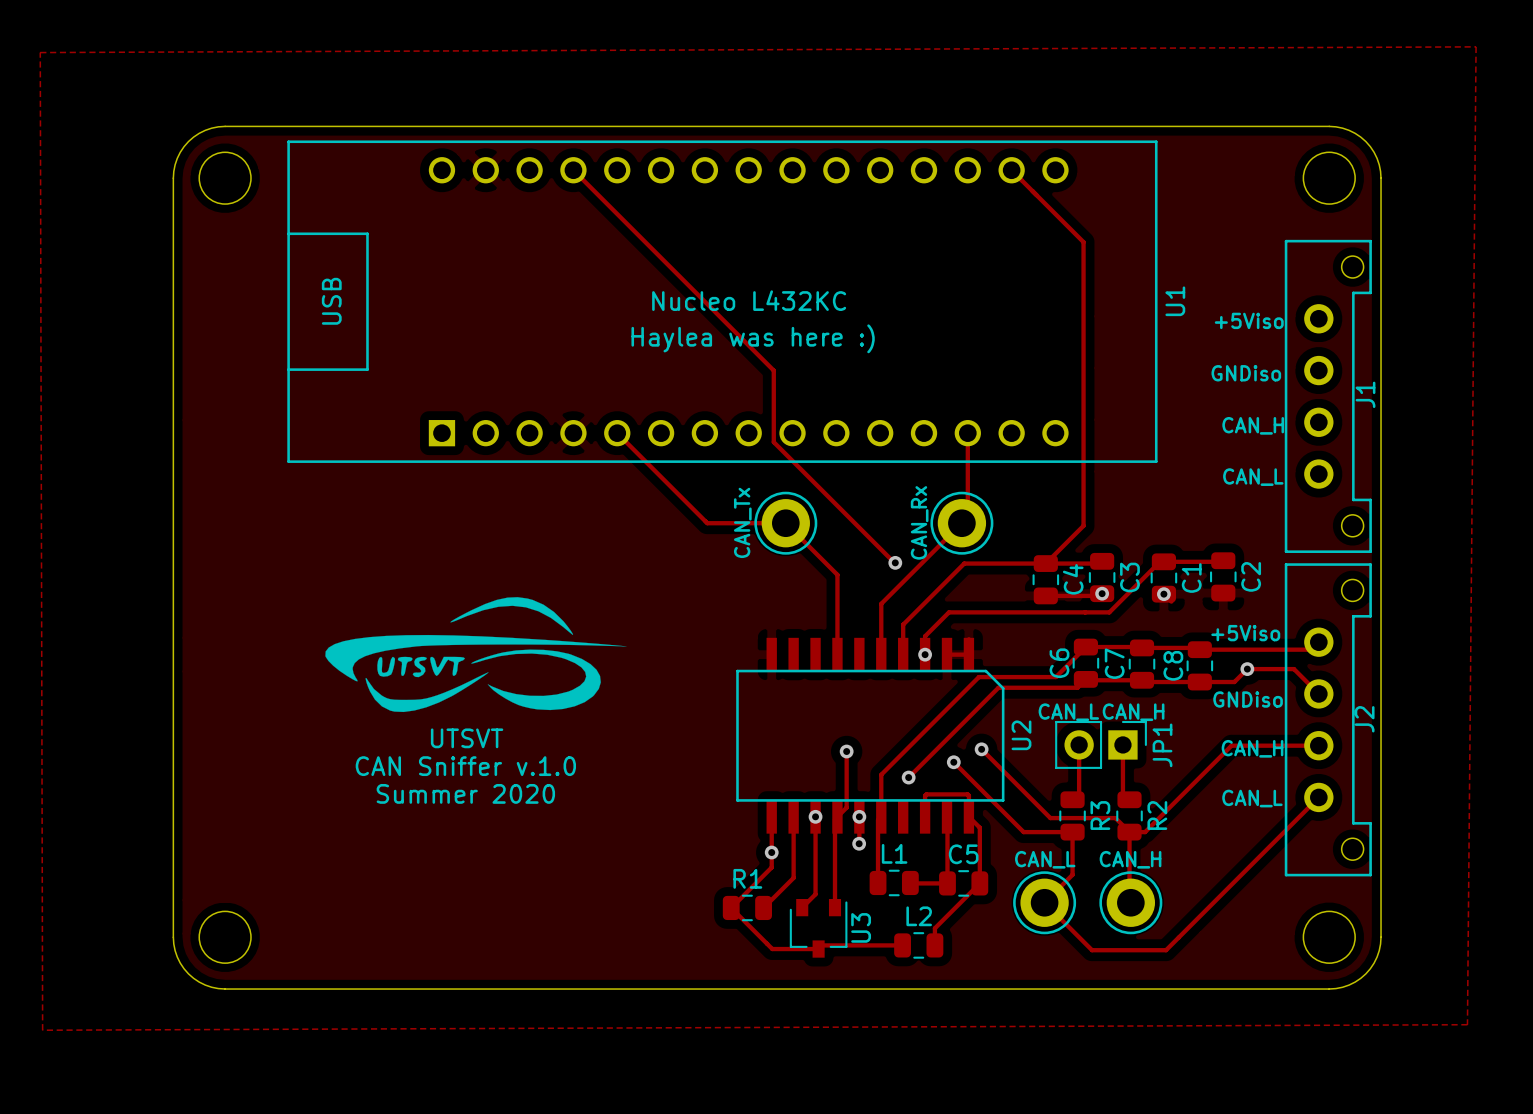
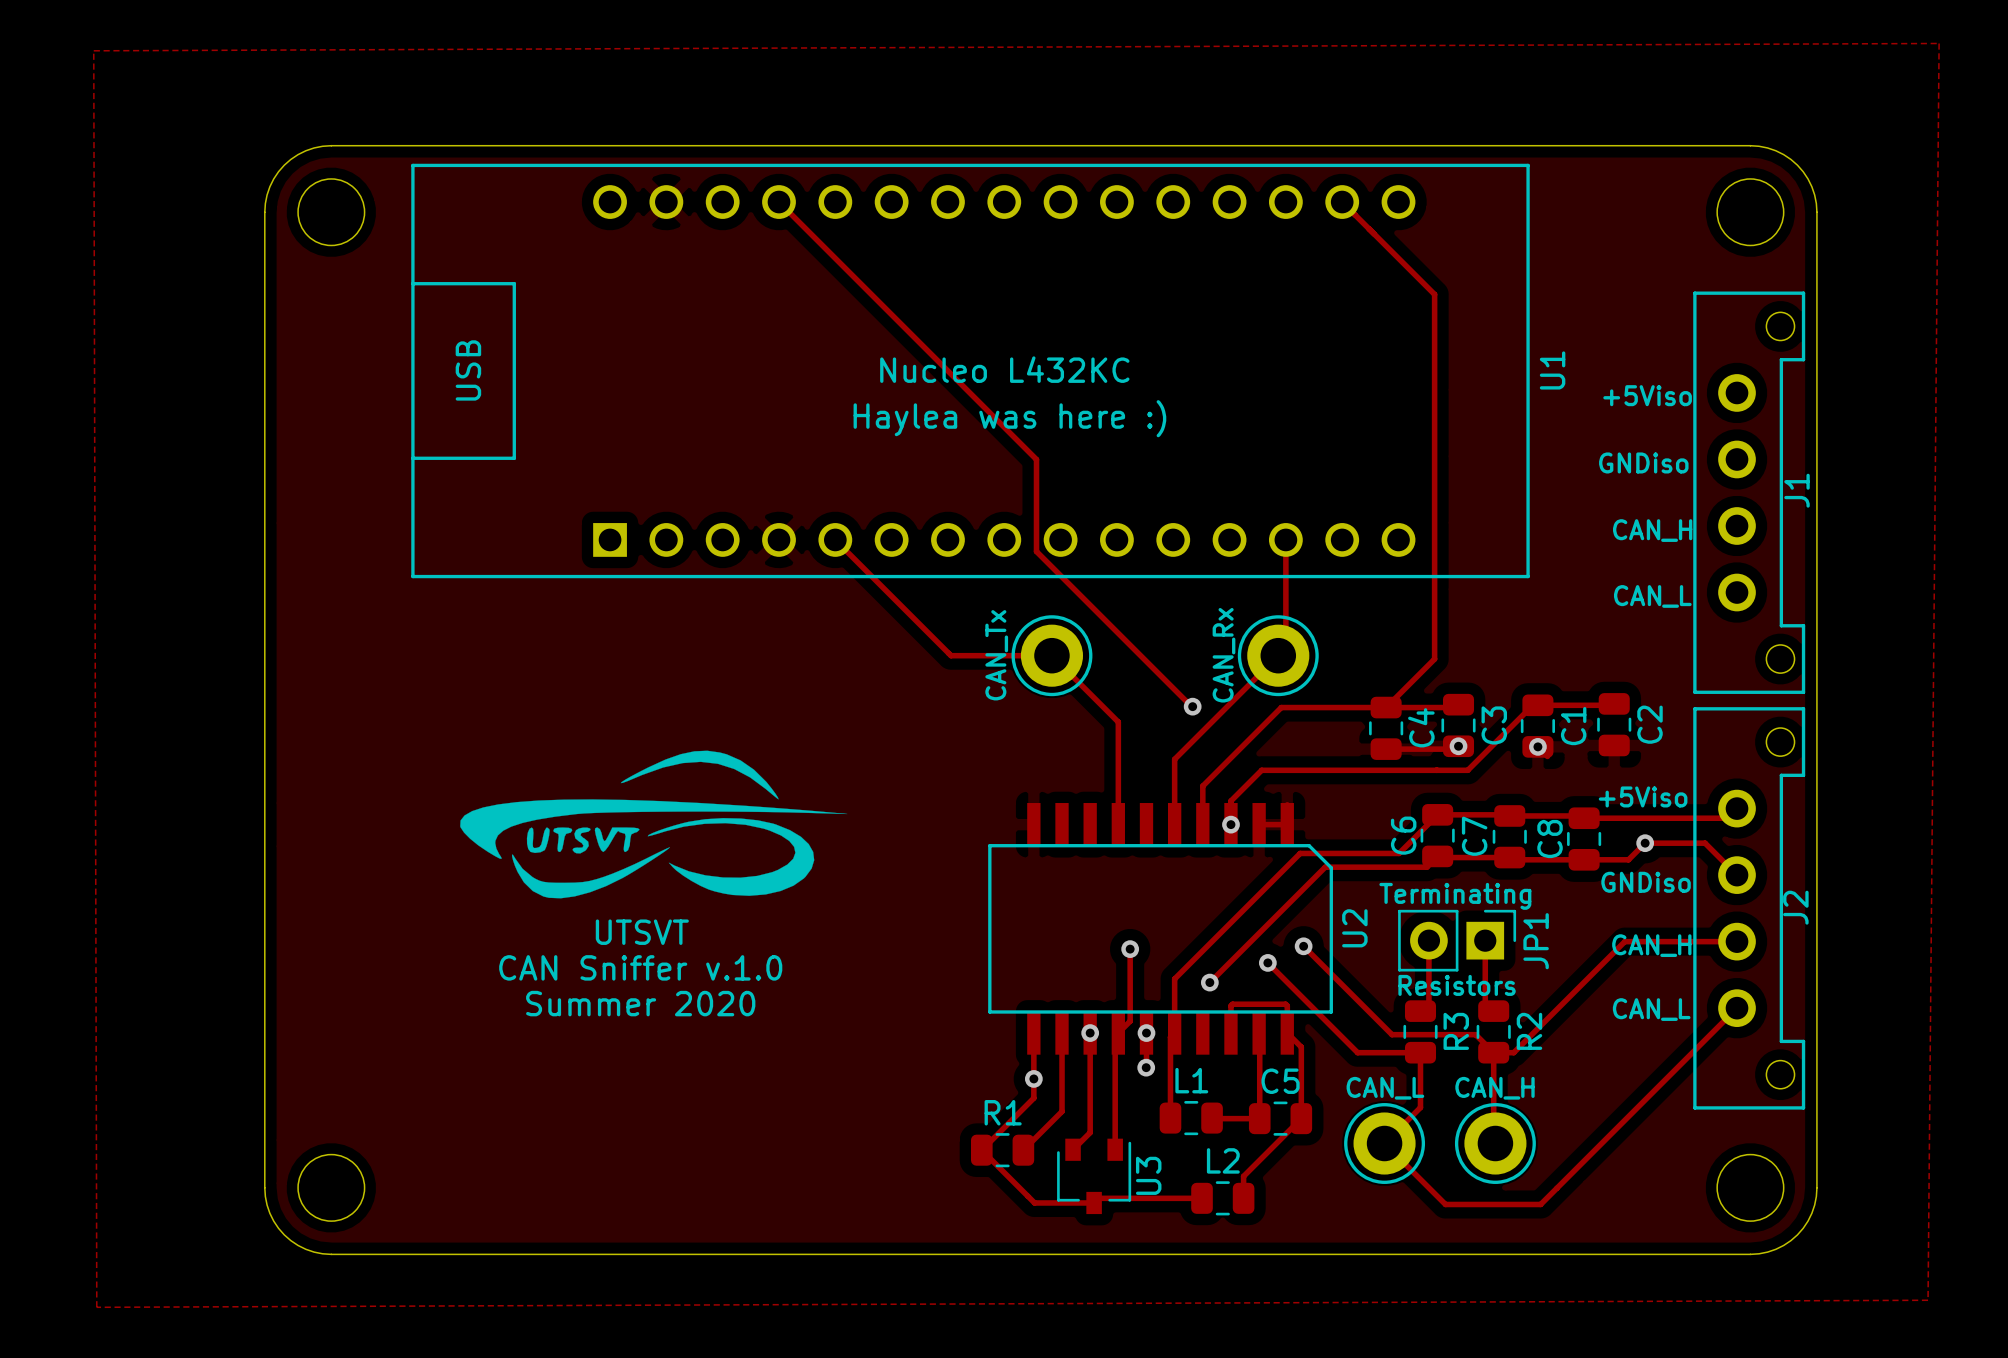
text: none -> Terminating (1455, 896)
text: CAN_L (1068, 712) -> none
text: CAN_H (1133, 712) -> none
text: none -> Resistors (1457, 985)

